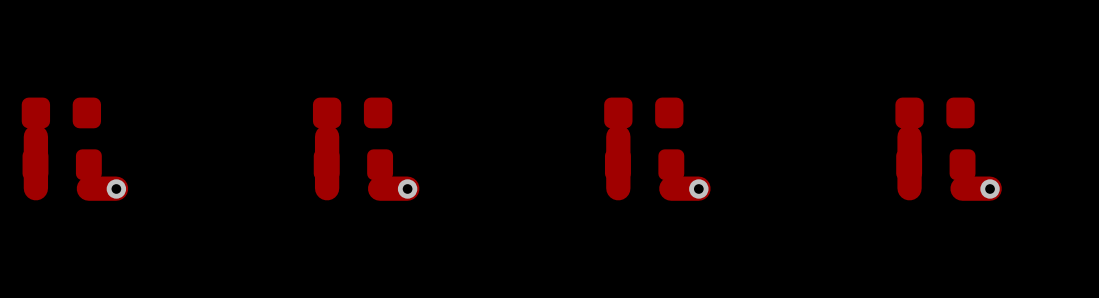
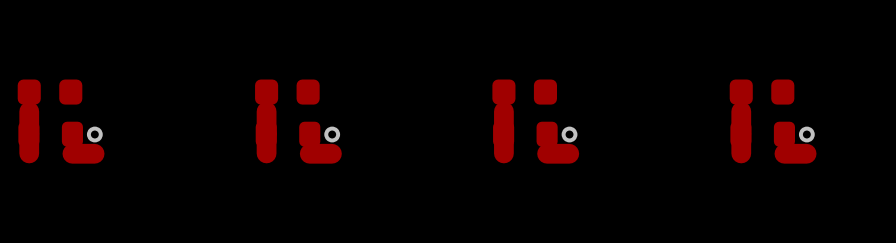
via position: (116, 188) -> (94, 134)
via position: (407, 188) -> (332, 134)
via position: (698, 188) -> (569, 134)
via position: (990, 188) -> (806, 134)

